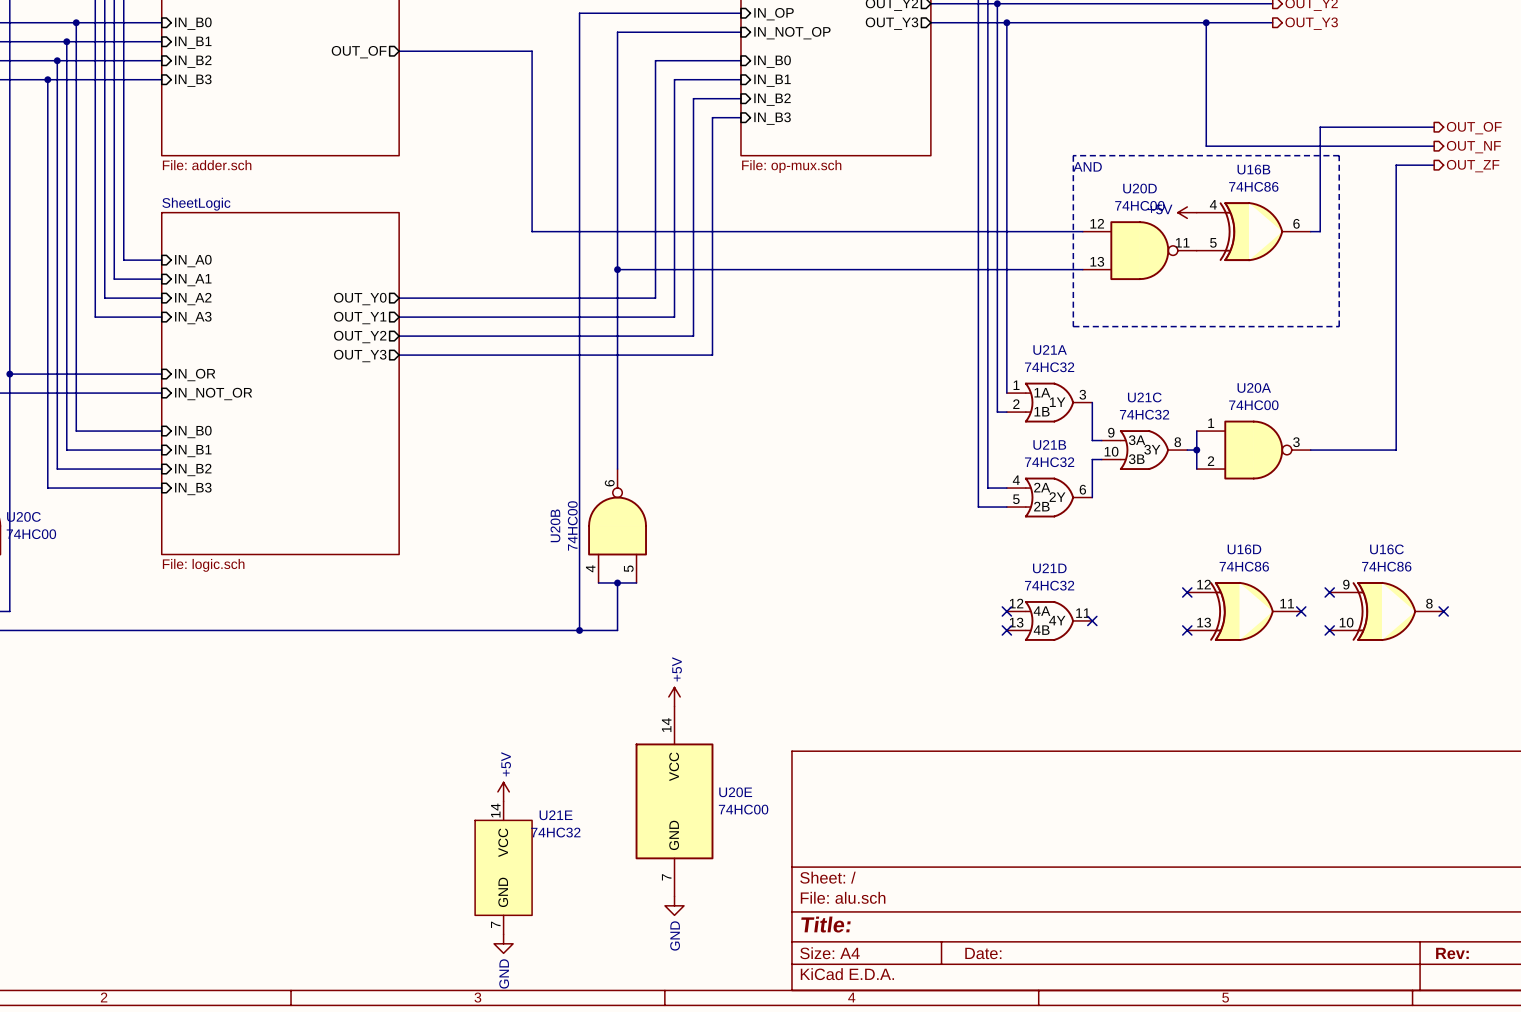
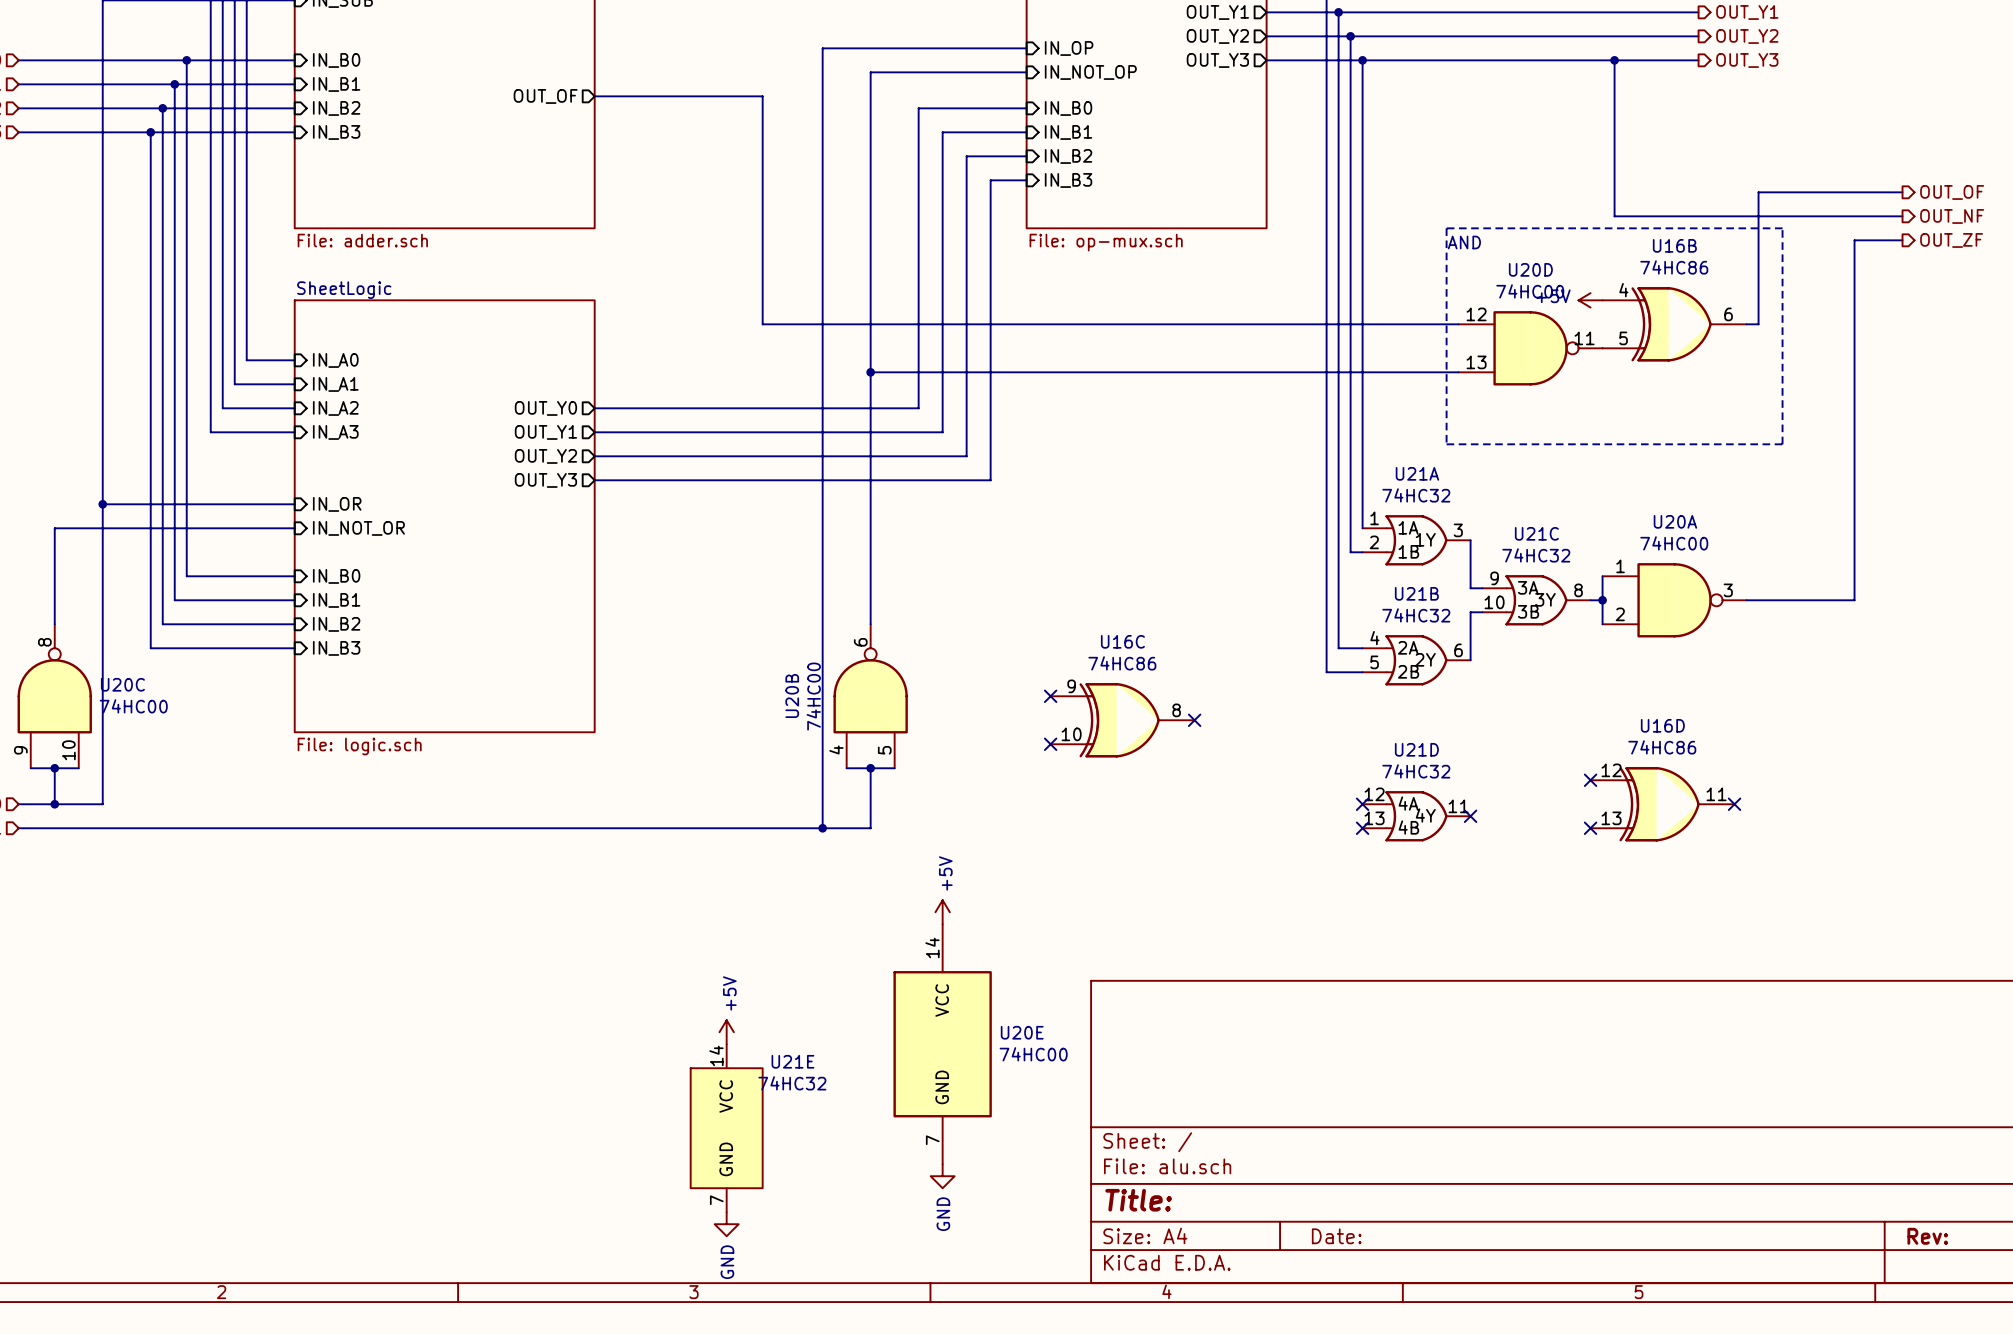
no-connect mark: none -> (1050, 696)
no-connect mark: none -> (1194, 720)
no-connect mark: none -> (1050, 744)
no-connect mark: (1329, 592) -> none
U16C position: (1386, 611) -> (1122, 720)
no-connect mark: (1443, 611) -> none
no-connect mark: (1329, 630) -> none

